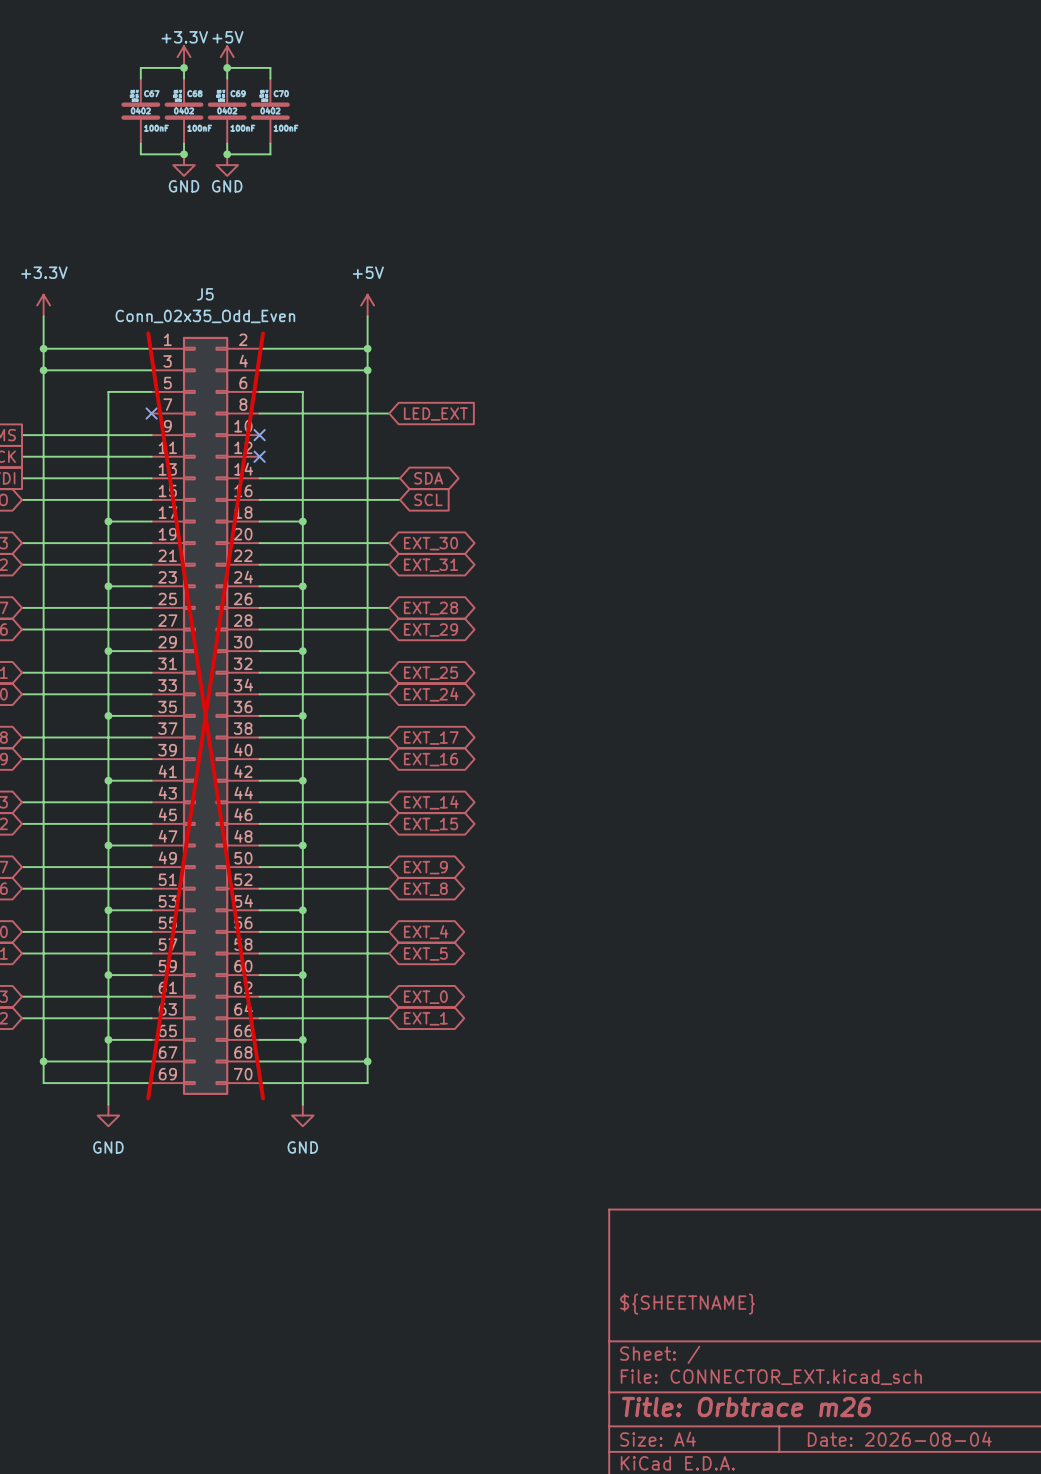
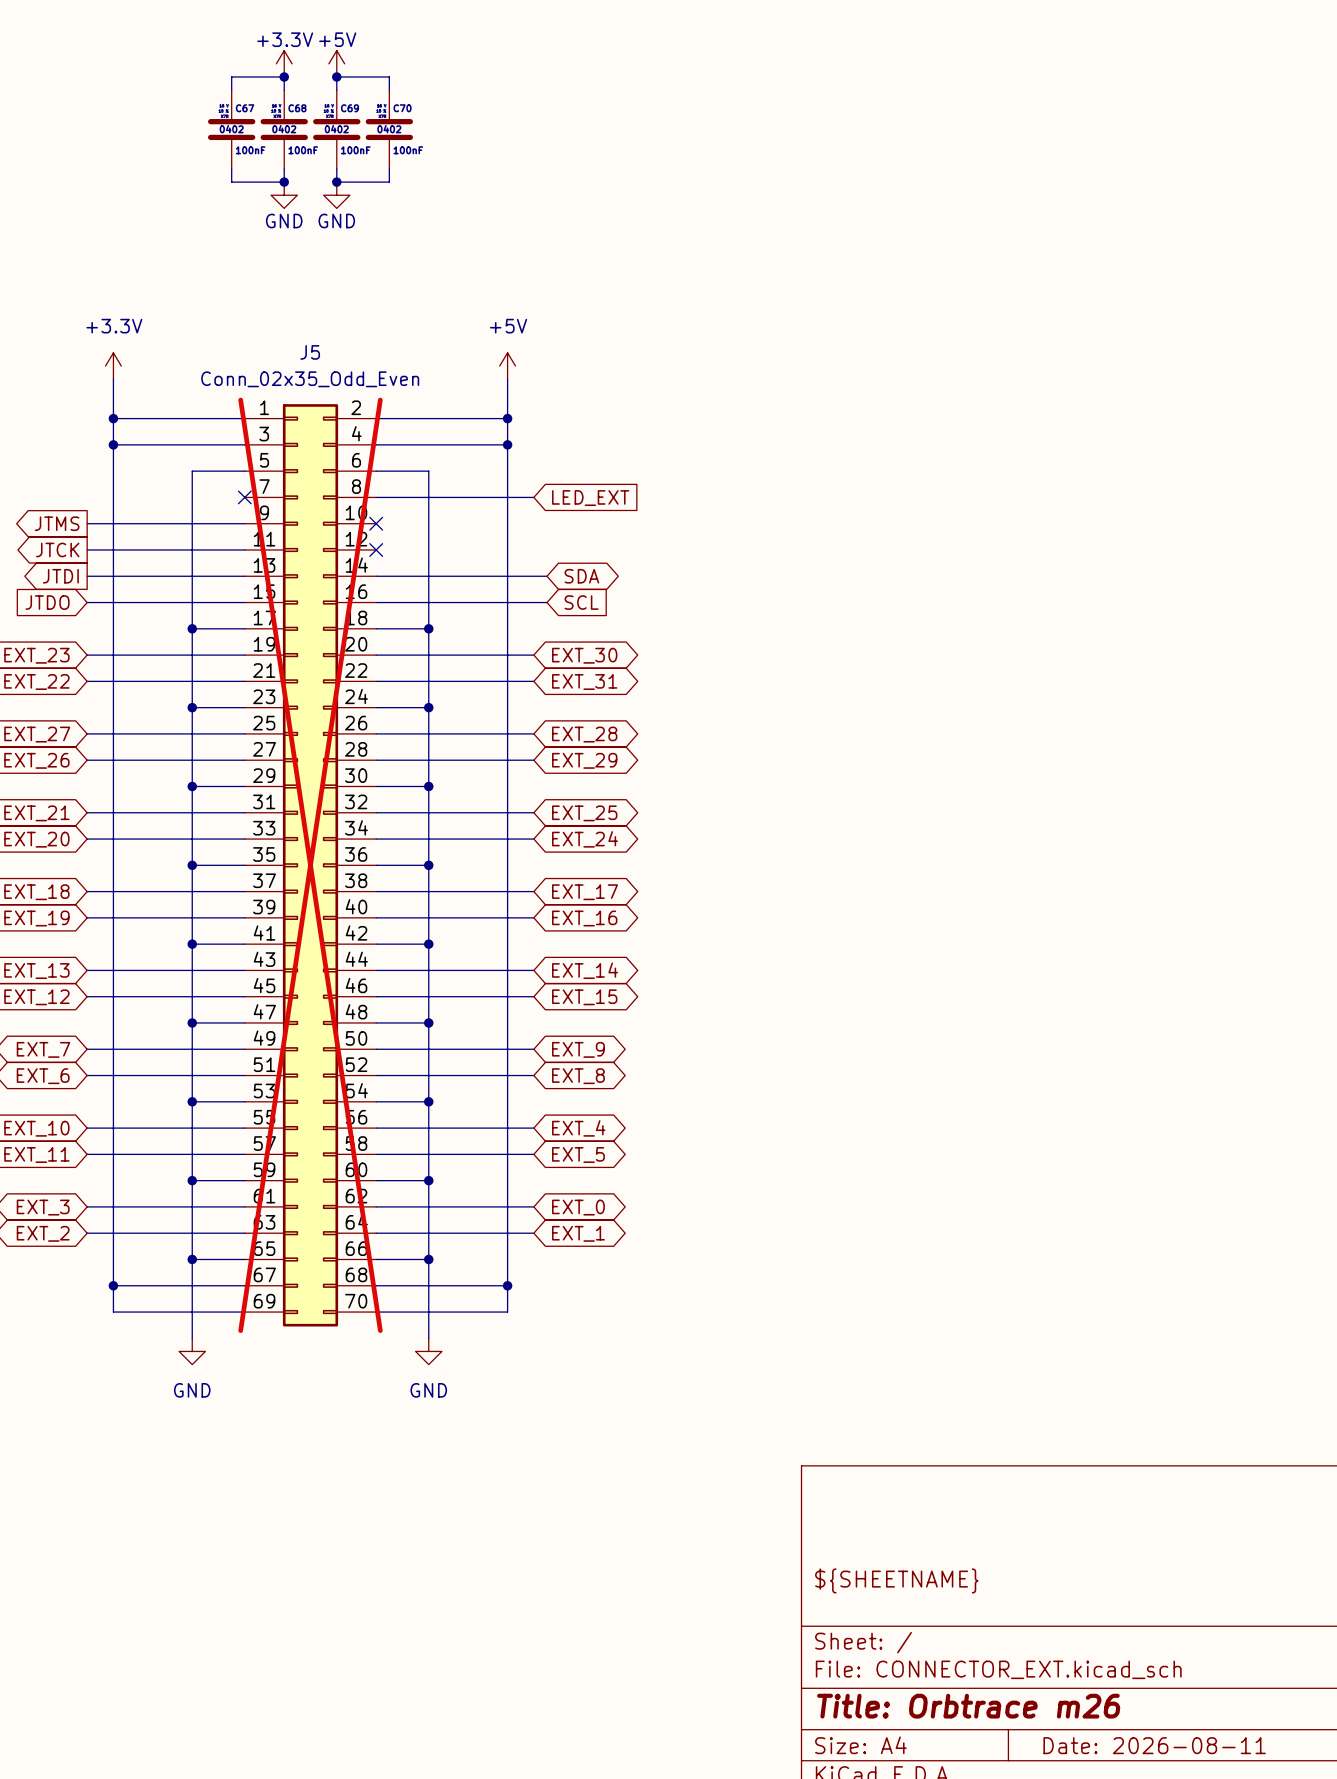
title block: Date: 2026-08-04 (899, 1439) -> Date: 2026-08-11 (1154, 1745)

